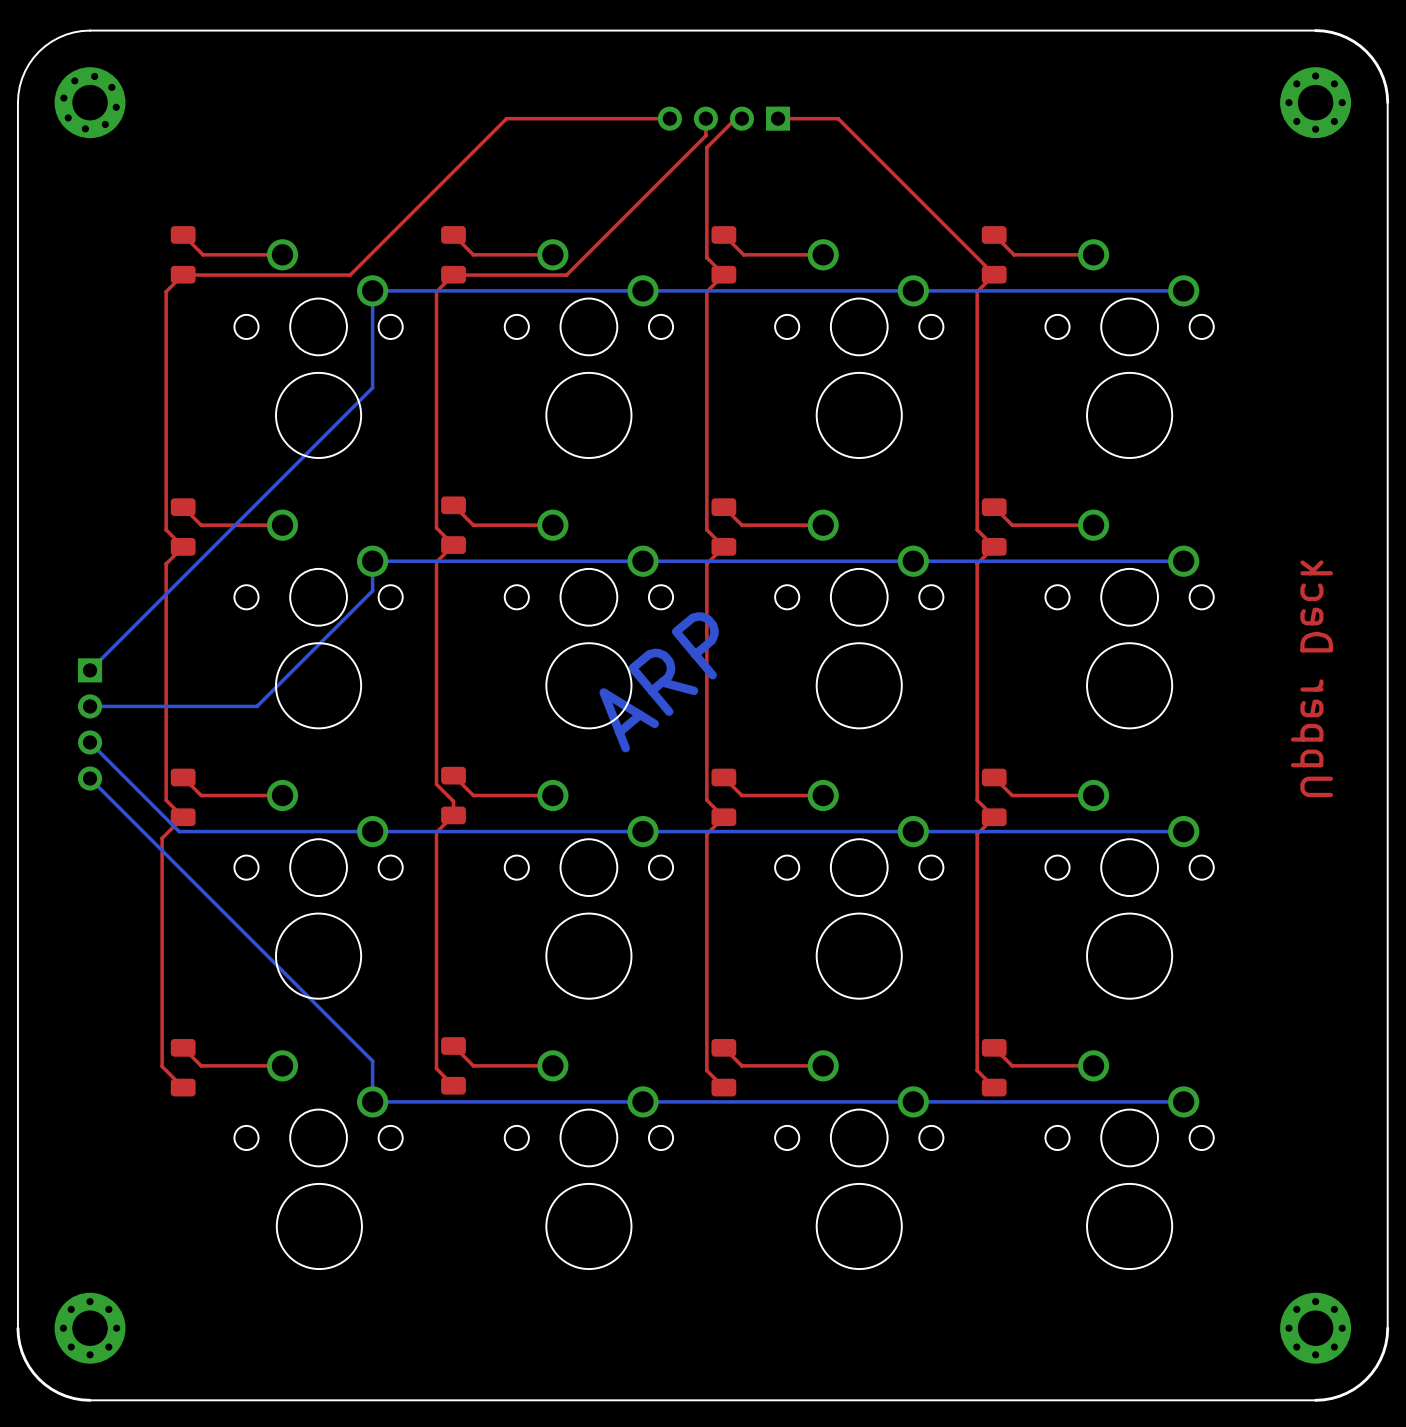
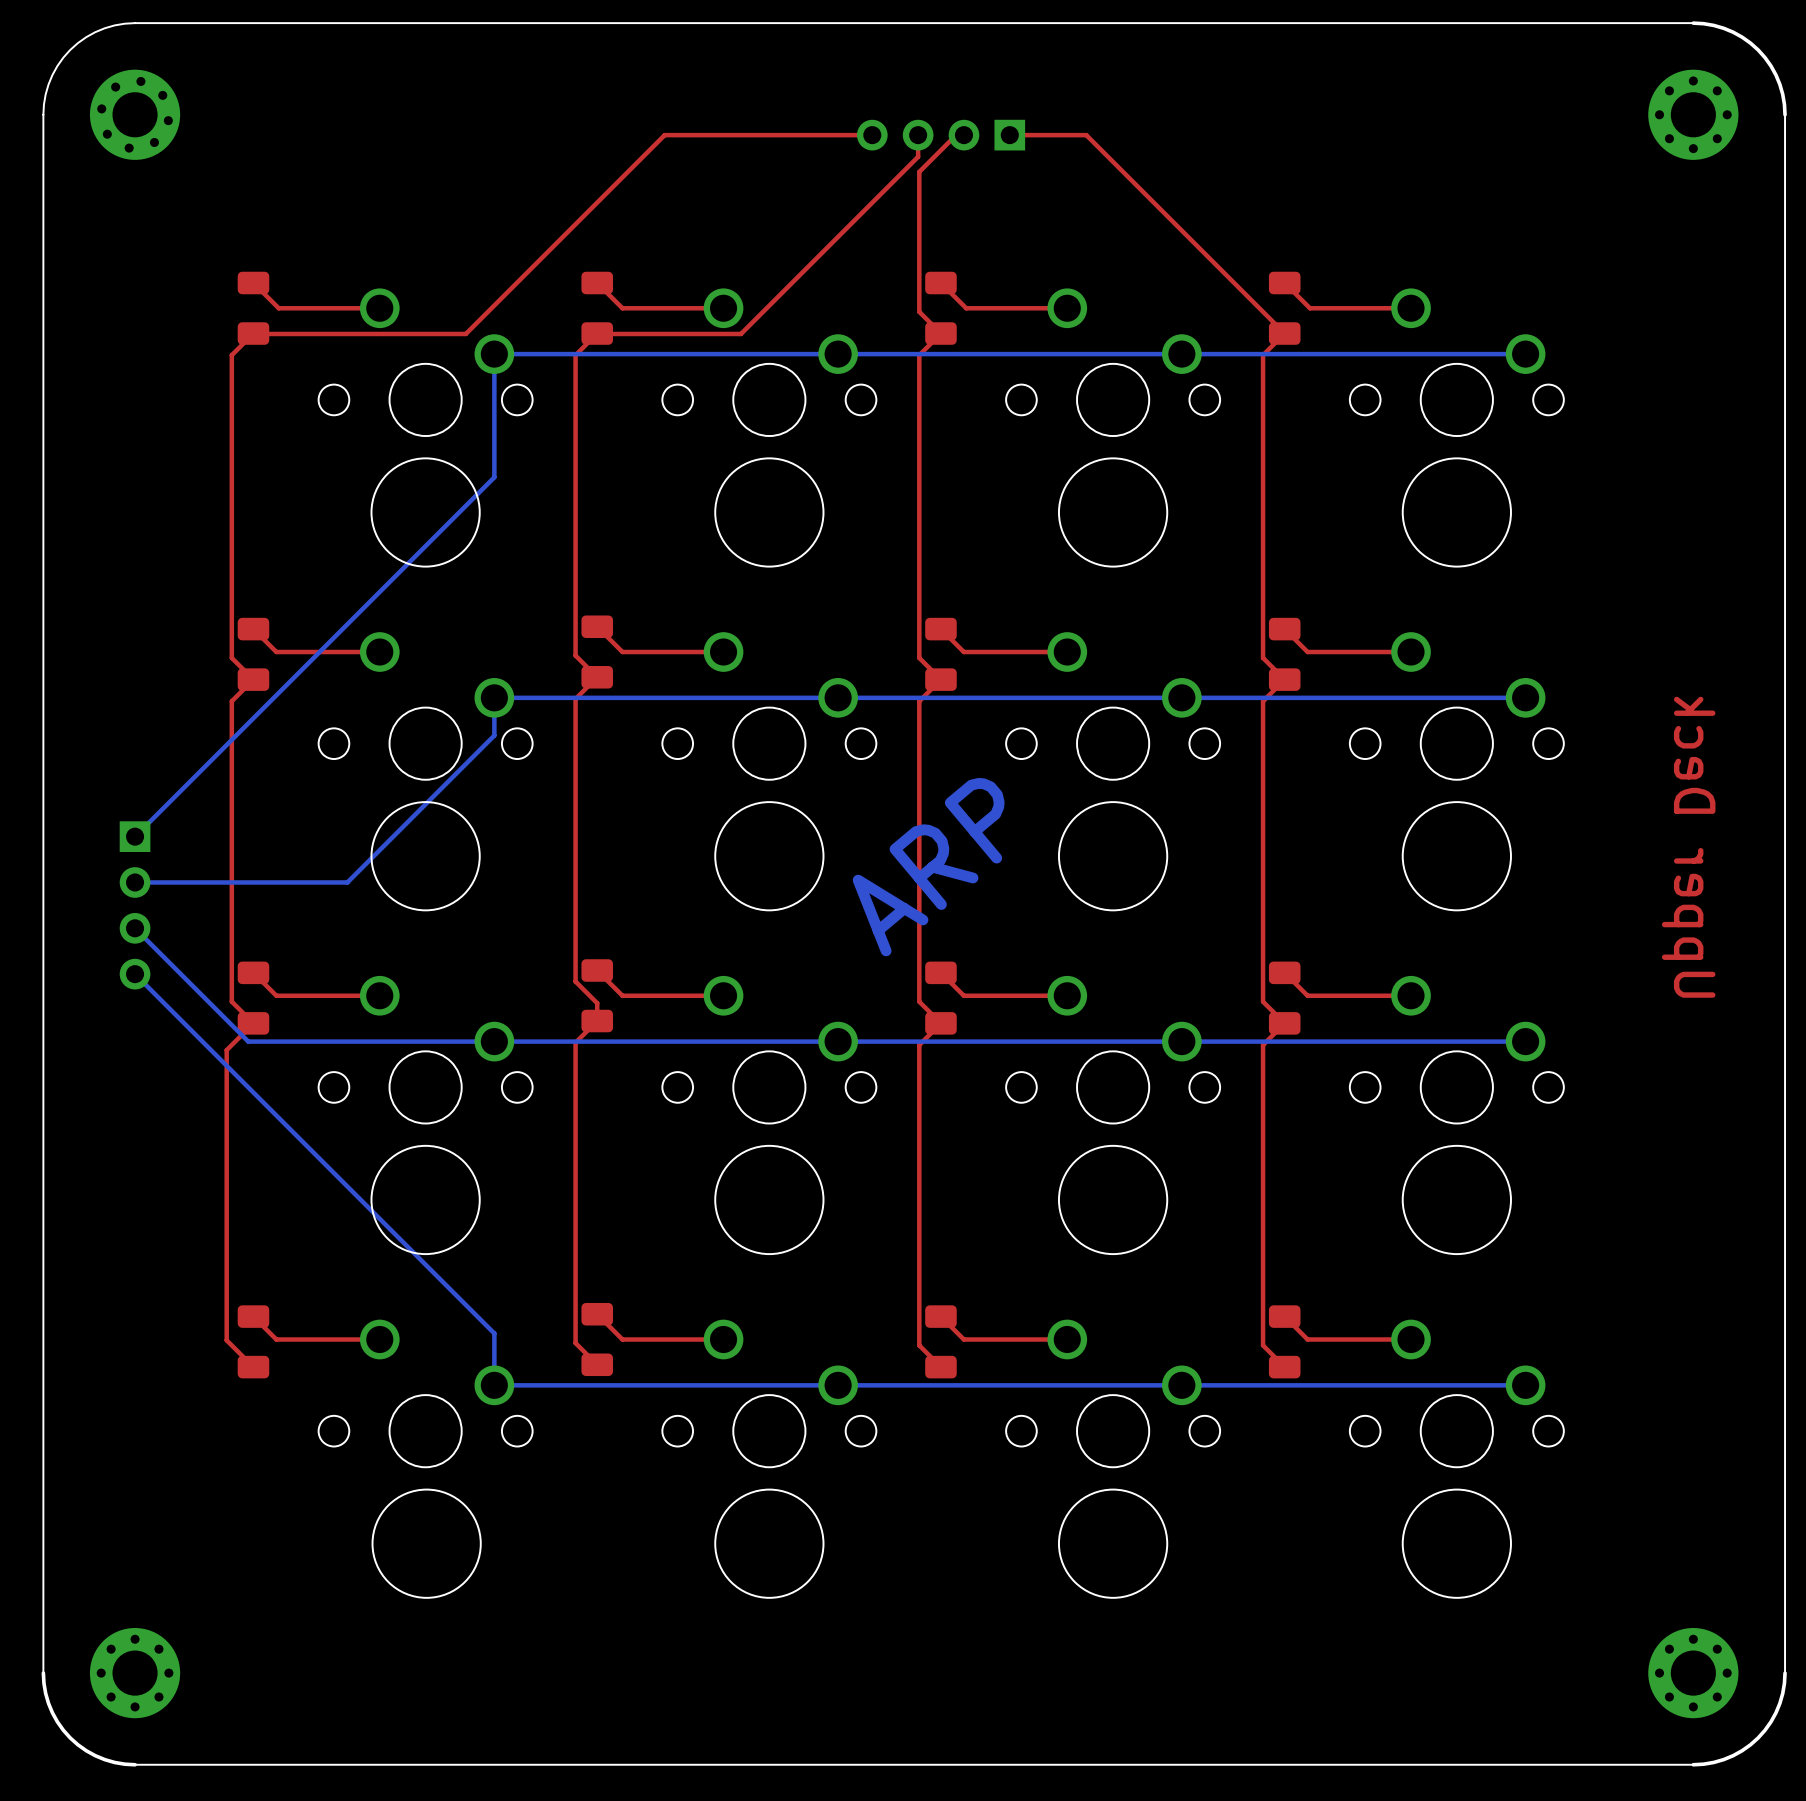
text position: ARP (659, 682) -> ARP (928, 867)

